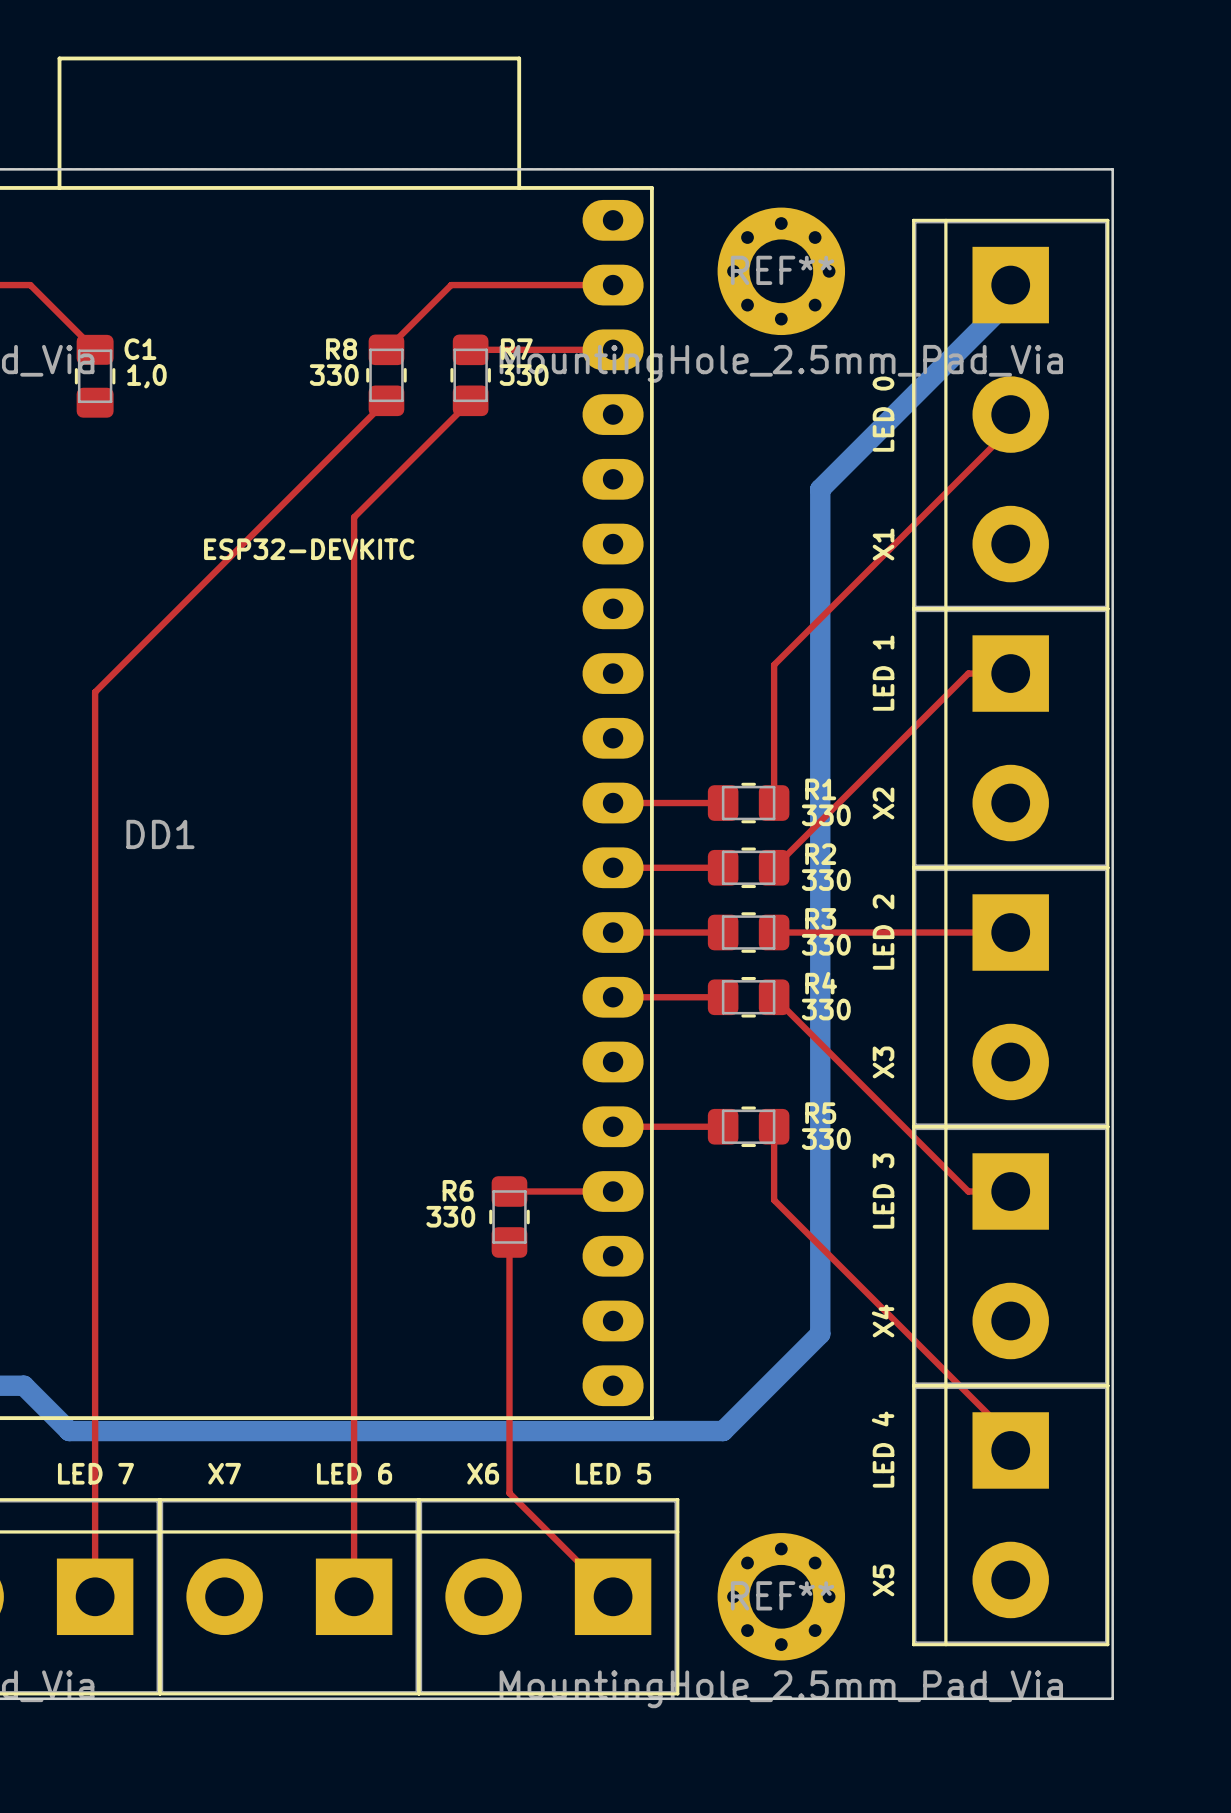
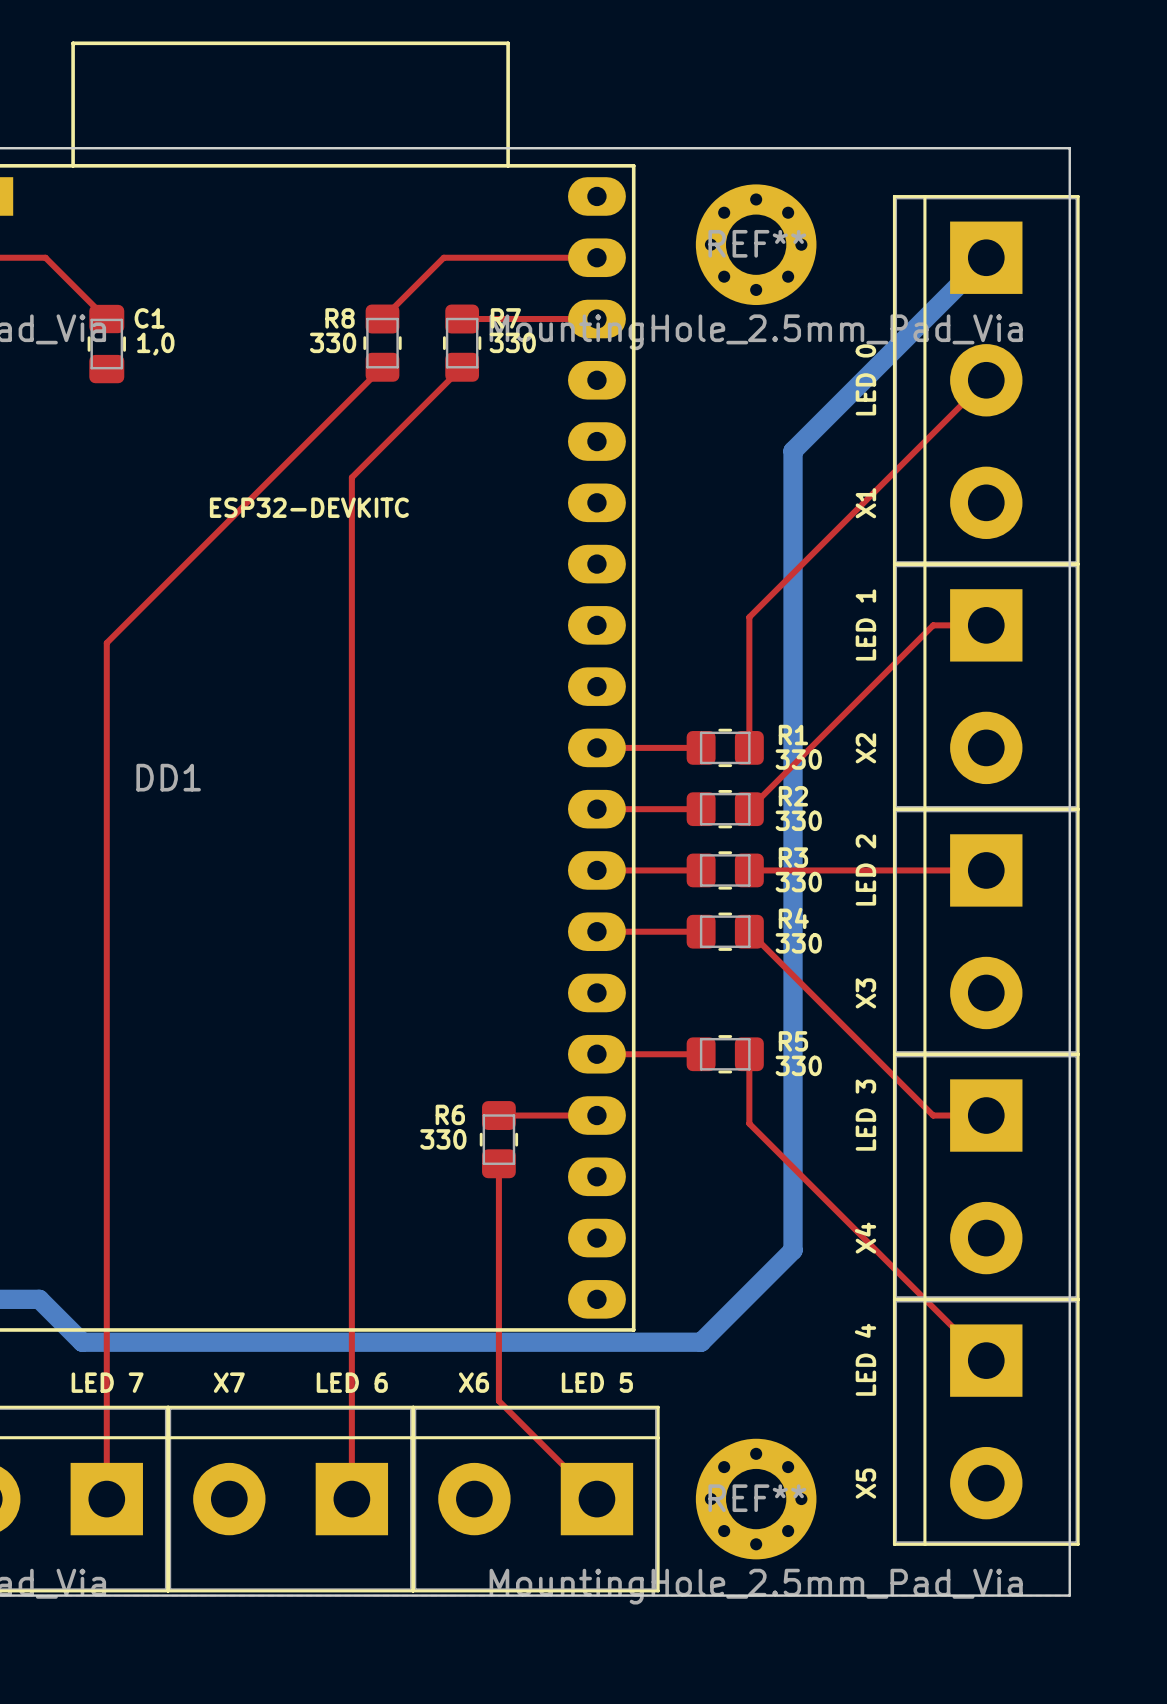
X1 position: (1010, 414) -> (986, 380)
X2 position: (1010, 738) -> (986, 686)
X3 position: (1010, 997) -> (986, 931)
X4 position: (1010, 1256) -> (986, 1176)
X5 position: (1010, 1515) -> (986, 1421)

